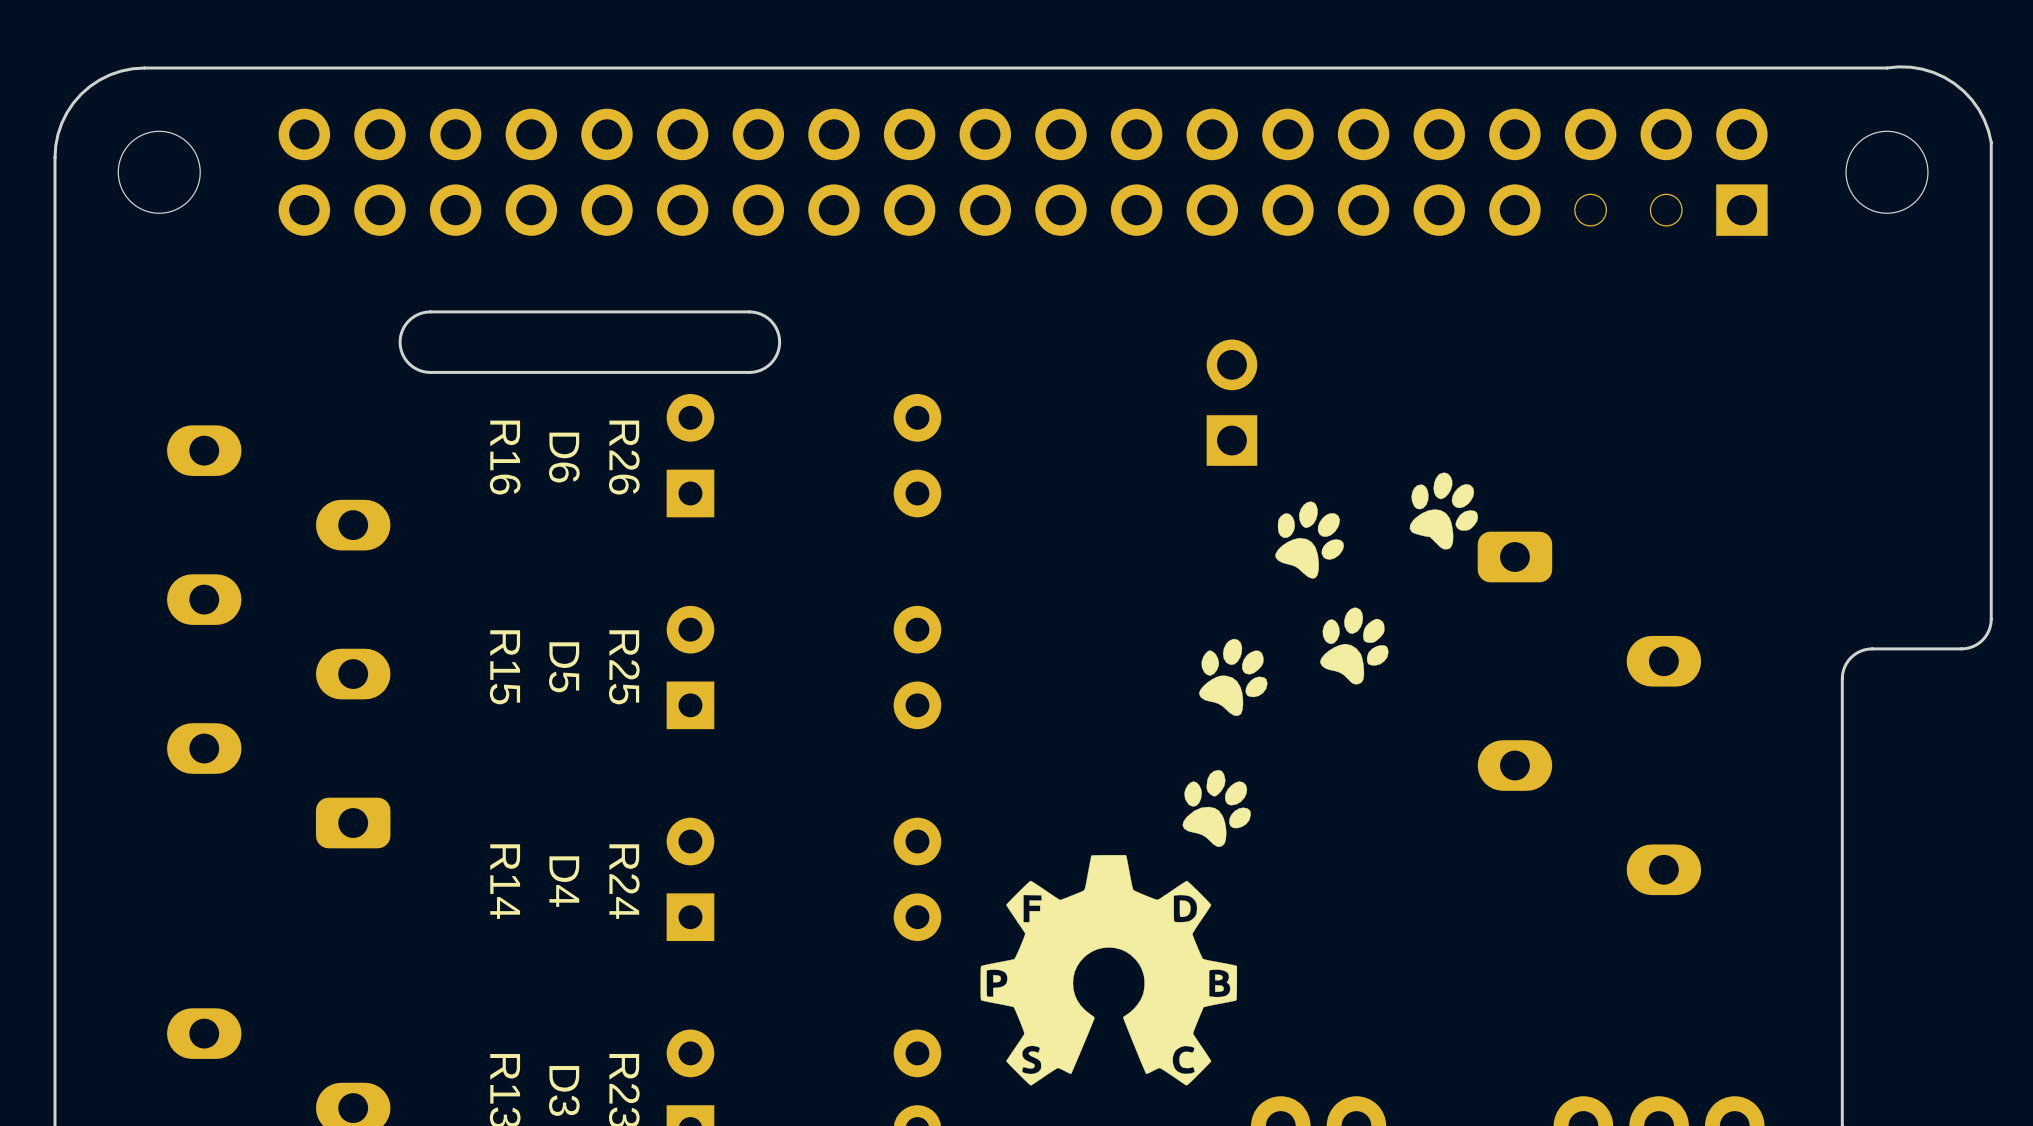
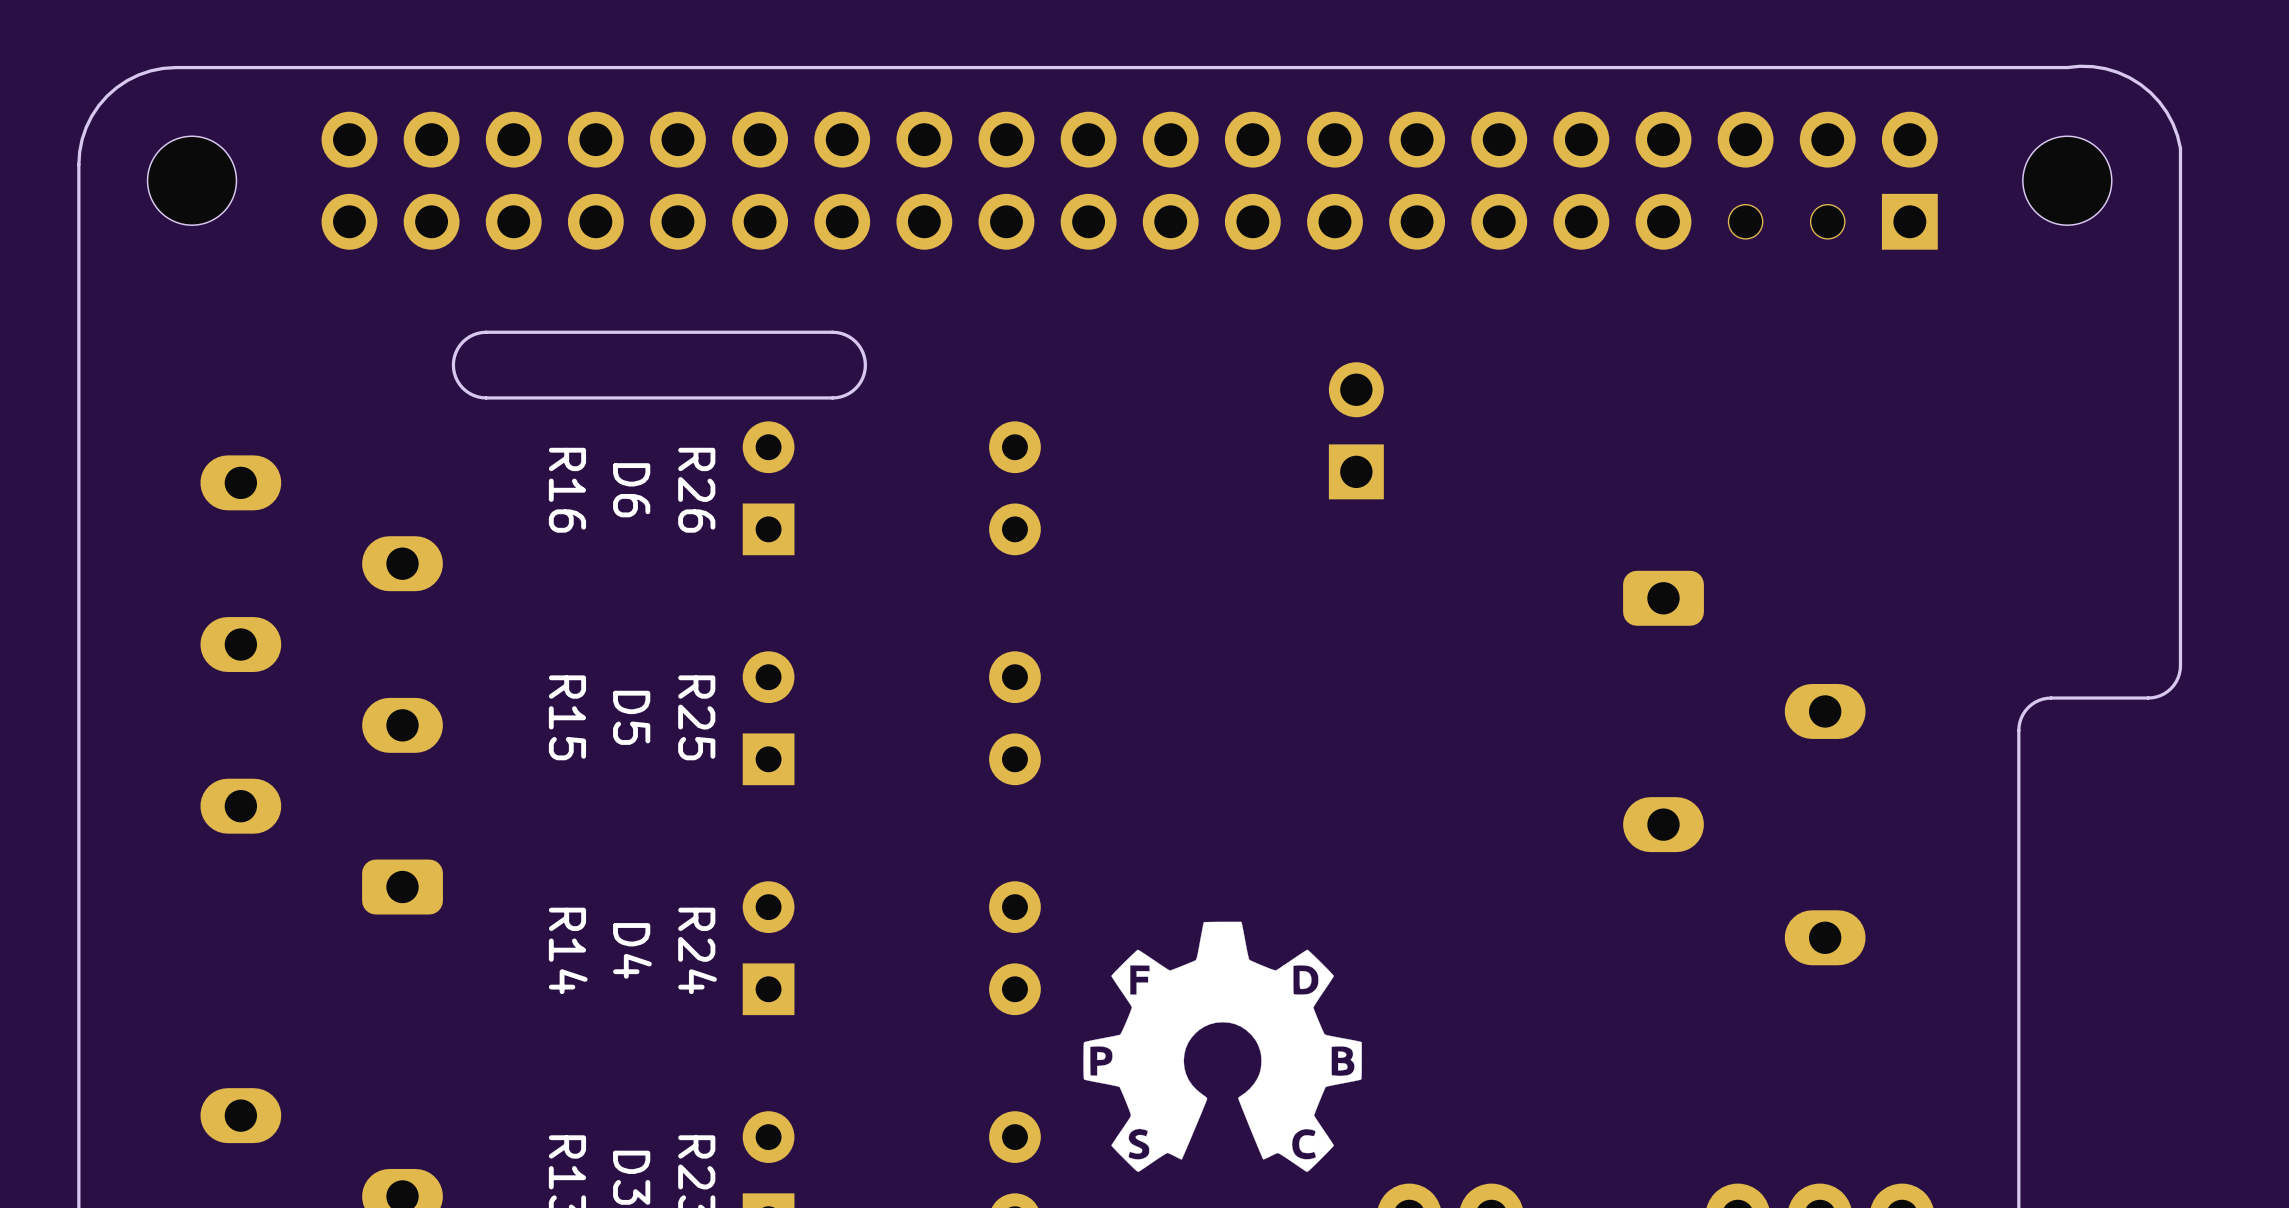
drawing: [1182, 472, 1479, 847] -> none

